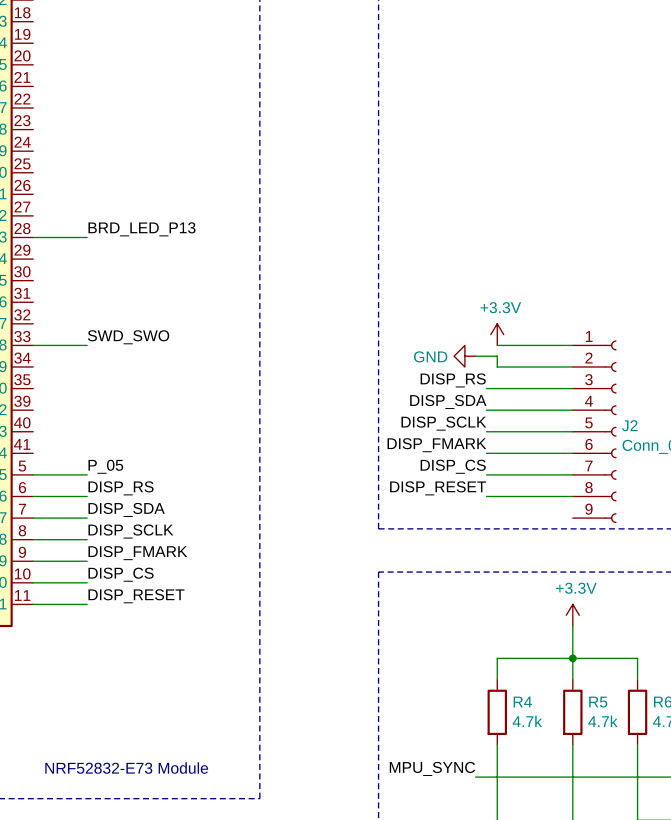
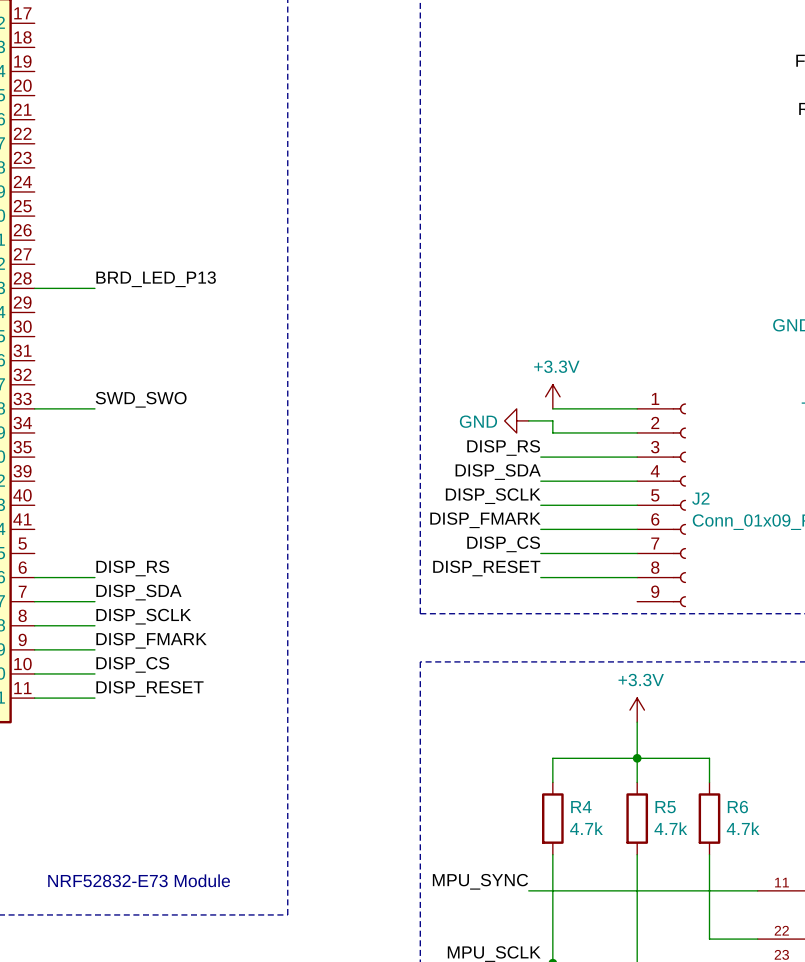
label: P_05 (105, 466) -> none
wire: (33, 474) (87, 474) -> none

